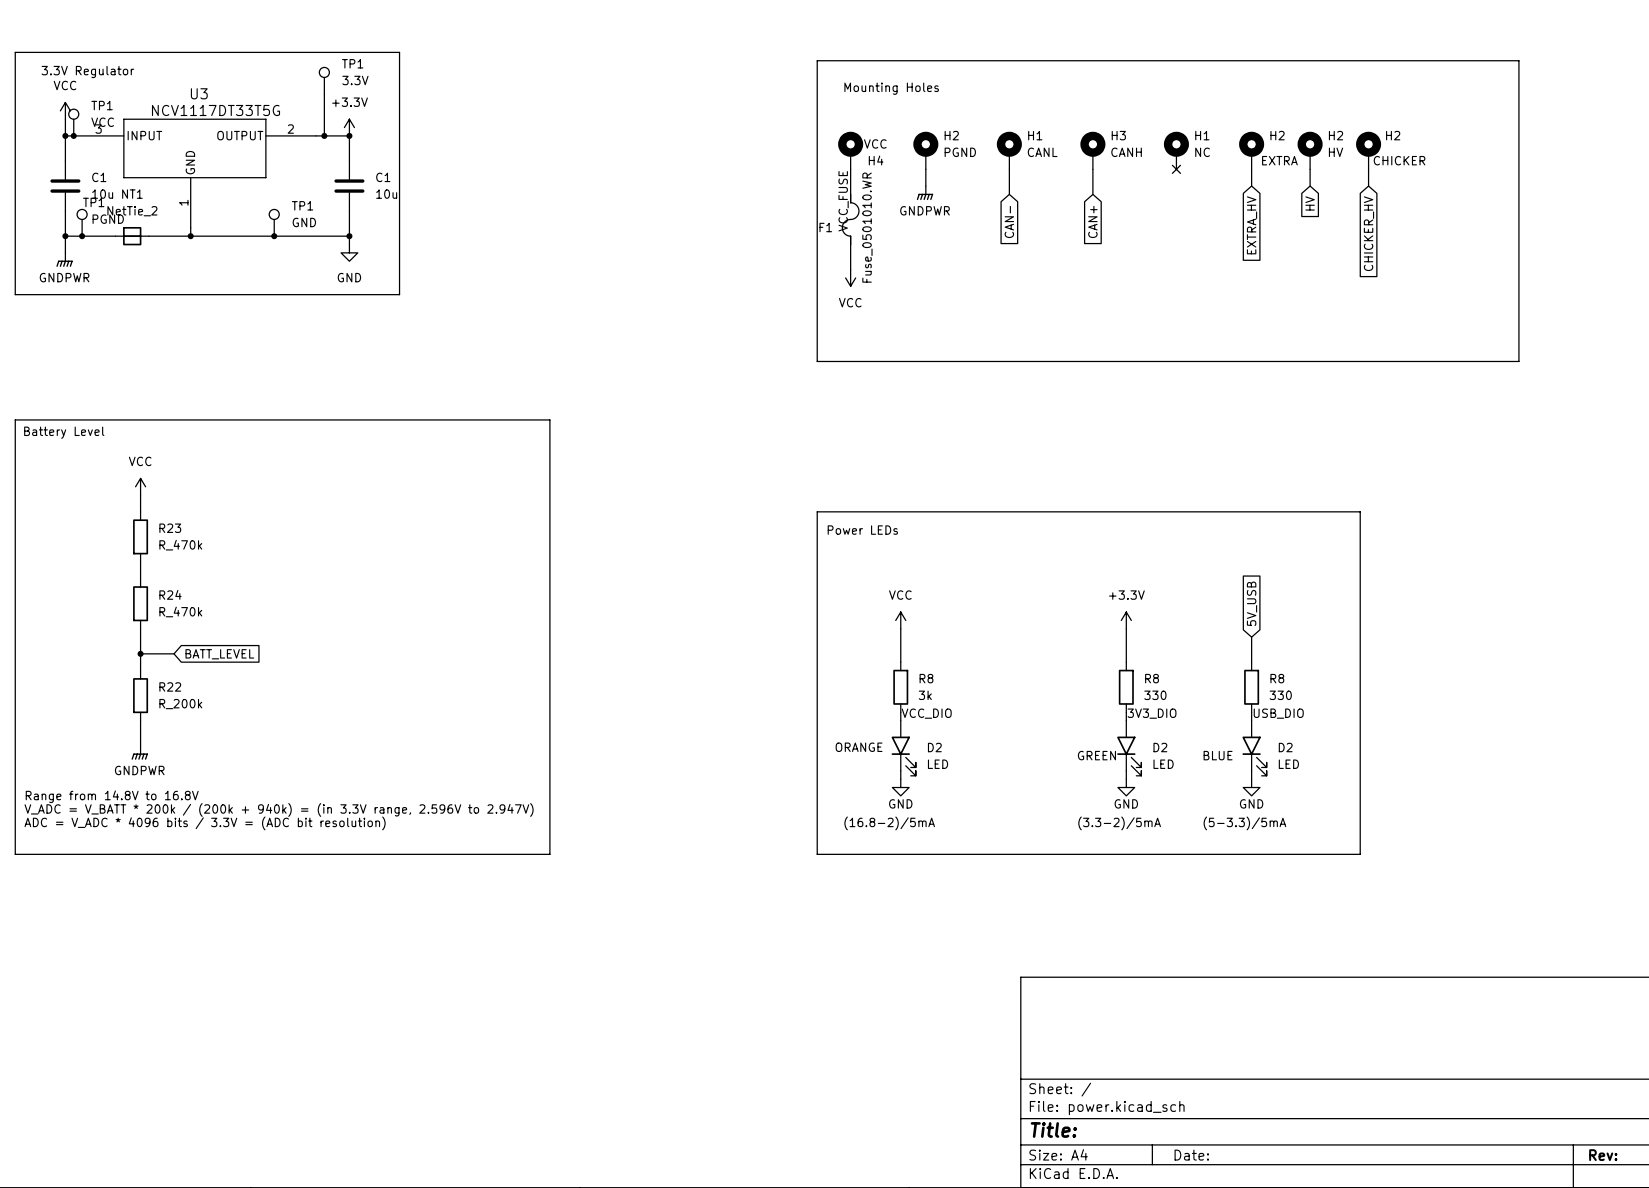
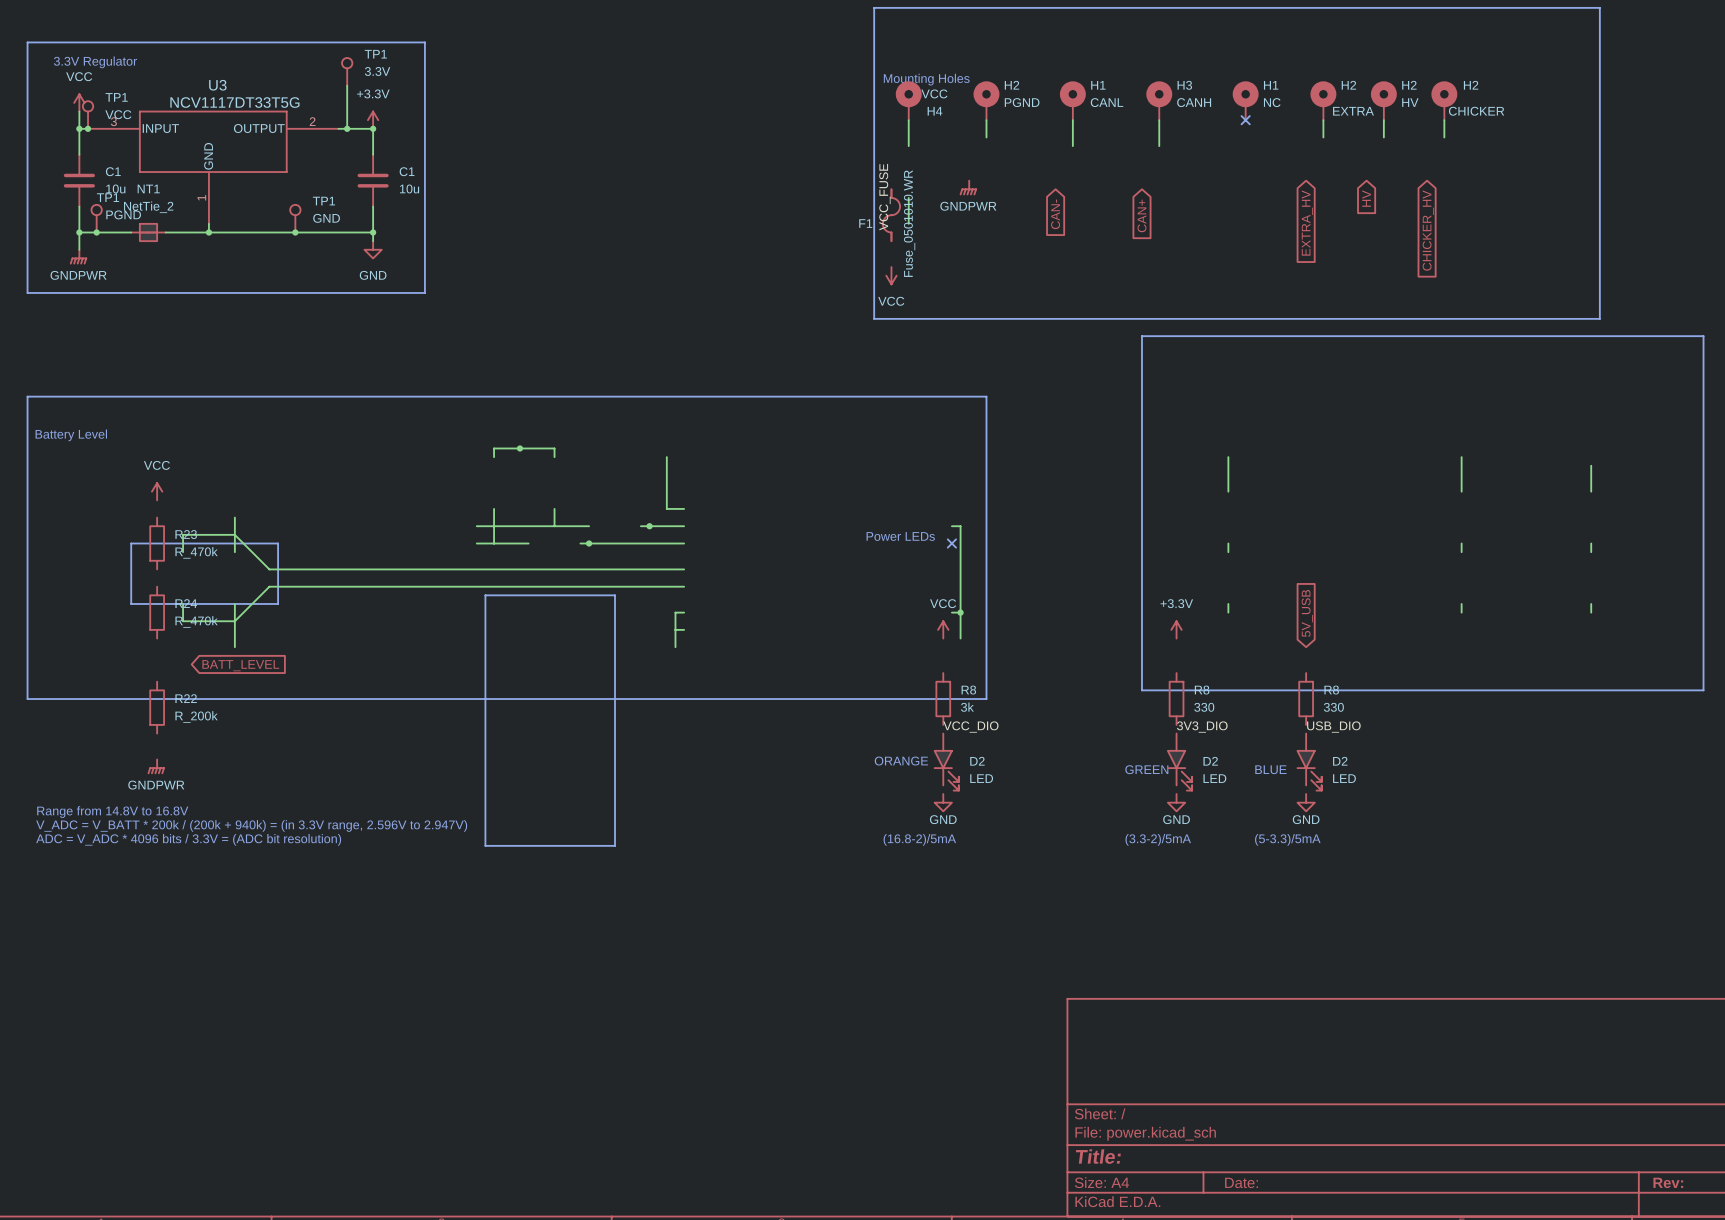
line: (817, 60) (1518, 60) (1518, 361) (817, 361) (817, 60) -> (874, 7) (1599, 7) (1599, 318) (874, 318) (874, 7)
no-connect mark: none -> (1245, 120)
H4 position: (850, 150) -> (908, 100)
H2 position: (925, 150) -> (986, 100)
H1 position: (1009, 150) -> (1072, 100)
H3 position: (1092, 150) -> (1159, 100)
H1 position: (1176, 150) -> (1245, 100)
H2 position: (1251, 150) -> (1323, 100)
H2 position: (1310, 150) -> (1383, 100)
H2 position: (1368, 150) -> (1444, 100)
wire: (850, 169) (850, 194) -> (908, 120) (908, 146)
wire: (925, 169) (925, 186) -> (986, 120) (986, 137)
wire: (1009, 169) (1009, 194) -> (1072, 120) (1072, 146)
wire: (1092, 169) (1092, 194) -> (1159, 120) (1159, 146)
no-connect mark: (1176, 169) -> none
wire: (1251, 169) (1251, 186) -> (1323, 120) (1323, 137)
wire: (1310, 169) (1310, 186) -> (1383, 120) (1383, 137)
wire: (1368, 169) (1368, 186) -> (1444, 120) (1444, 137)
wire: (850, 244) (850, 269) -> (908, 197) (908, 223)
line: none -> (1141, 336) (1703, 336) (1703, 690) (1141, 690) (1141, 336)
line: (15, 419) (549, 419) (549, 854) (15, 854) (15, 687) -> (27, 422) (27, 396) (986, 396) (986, 699) (27, 699)
junction: none -> (519, 448)
wire: none -> (494, 457) (494, 448) (554, 448) (554, 457)
wire: none -> (666, 457) (666, 508) (684, 508)
wire: none -> (1228, 457) (1228, 491)
wire: none -> (1461, 457) (1461, 491)
wire: none -> (1591, 465) (1591, 491)
wire: (140, 495) (140, 511) -> none
wire: none -> (494, 508) (494, 543)
wire: none -> (554, 508) (554, 526)
wire: none -> (234, 517) (234, 552)
line: (817, 511) (817, 854) (1360, 854) (1360, 511) (817, 511) -> none
wire: none -> (476, 526) (589, 526)
wire: none -> (640, 526) (684, 526)
junction: none -> (649, 526)
wire: none -> (951, 526) (960, 526) (960, 638)
line: none -> (131, 543) (278, 543) (278, 603) (131, 603) (131, 543)
wire: none -> (476, 543) (528, 543)
wire: none -> (580, 543) (684, 543)
junction: none -> (589, 543)
no-connect mark: none -> (951, 543)
wire: none -> (1228, 543) (1228, 552)
wire: none -> (1461, 543) (1461, 552)
wire: none -> (1591, 543) (1591, 552)
wire: none -> (183, 552) (183, 534) (234, 534) (269, 569) (684, 569)
wire: (140, 561) (140, 578) -> none
wire: none -> (684, 586) (269, 586) (234, 621) (183, 621) (183, 603)
line: none -> (485, 595) (615, 595) (615, 845) (485, 845) (485, 595)
wire: none -> (1461, 603) (1461, 612)
wire: none -> (1591, 603) (1591, 612)
wire: none -> (684, 612) (675, 612) (675, 647)
wire: none -> (951, 612) (960, 612)
junction: none -> (960, 612)
wire: none -> (675, 629) (684, 629)
wire: (140, 628) (140, 670) -> (234, 603) (234, 647)
wire: (900, 628) (900, 662) -> none
wire: (1126, 628) (1126, 662) -> none
wire: (1251, 637) (1251, 662) -> none
wire: (140, 653) (173, 653) -> none
junction: (140, 653) -> none
wire: (900, 712) (900, 720) -> none
wire: (1126, 712) (1126, 720) -> (1228, 603) (1228, 612)
wire: (1251, 712) (1251, 720) -> none
wire: (140, 720) (140, 745) -> none
wire: (900, 770) (900, 779) -> none
wire: (1126, 770) (1126, 779) -> none
wire: (1251, 770) (1251, 779) -> none

